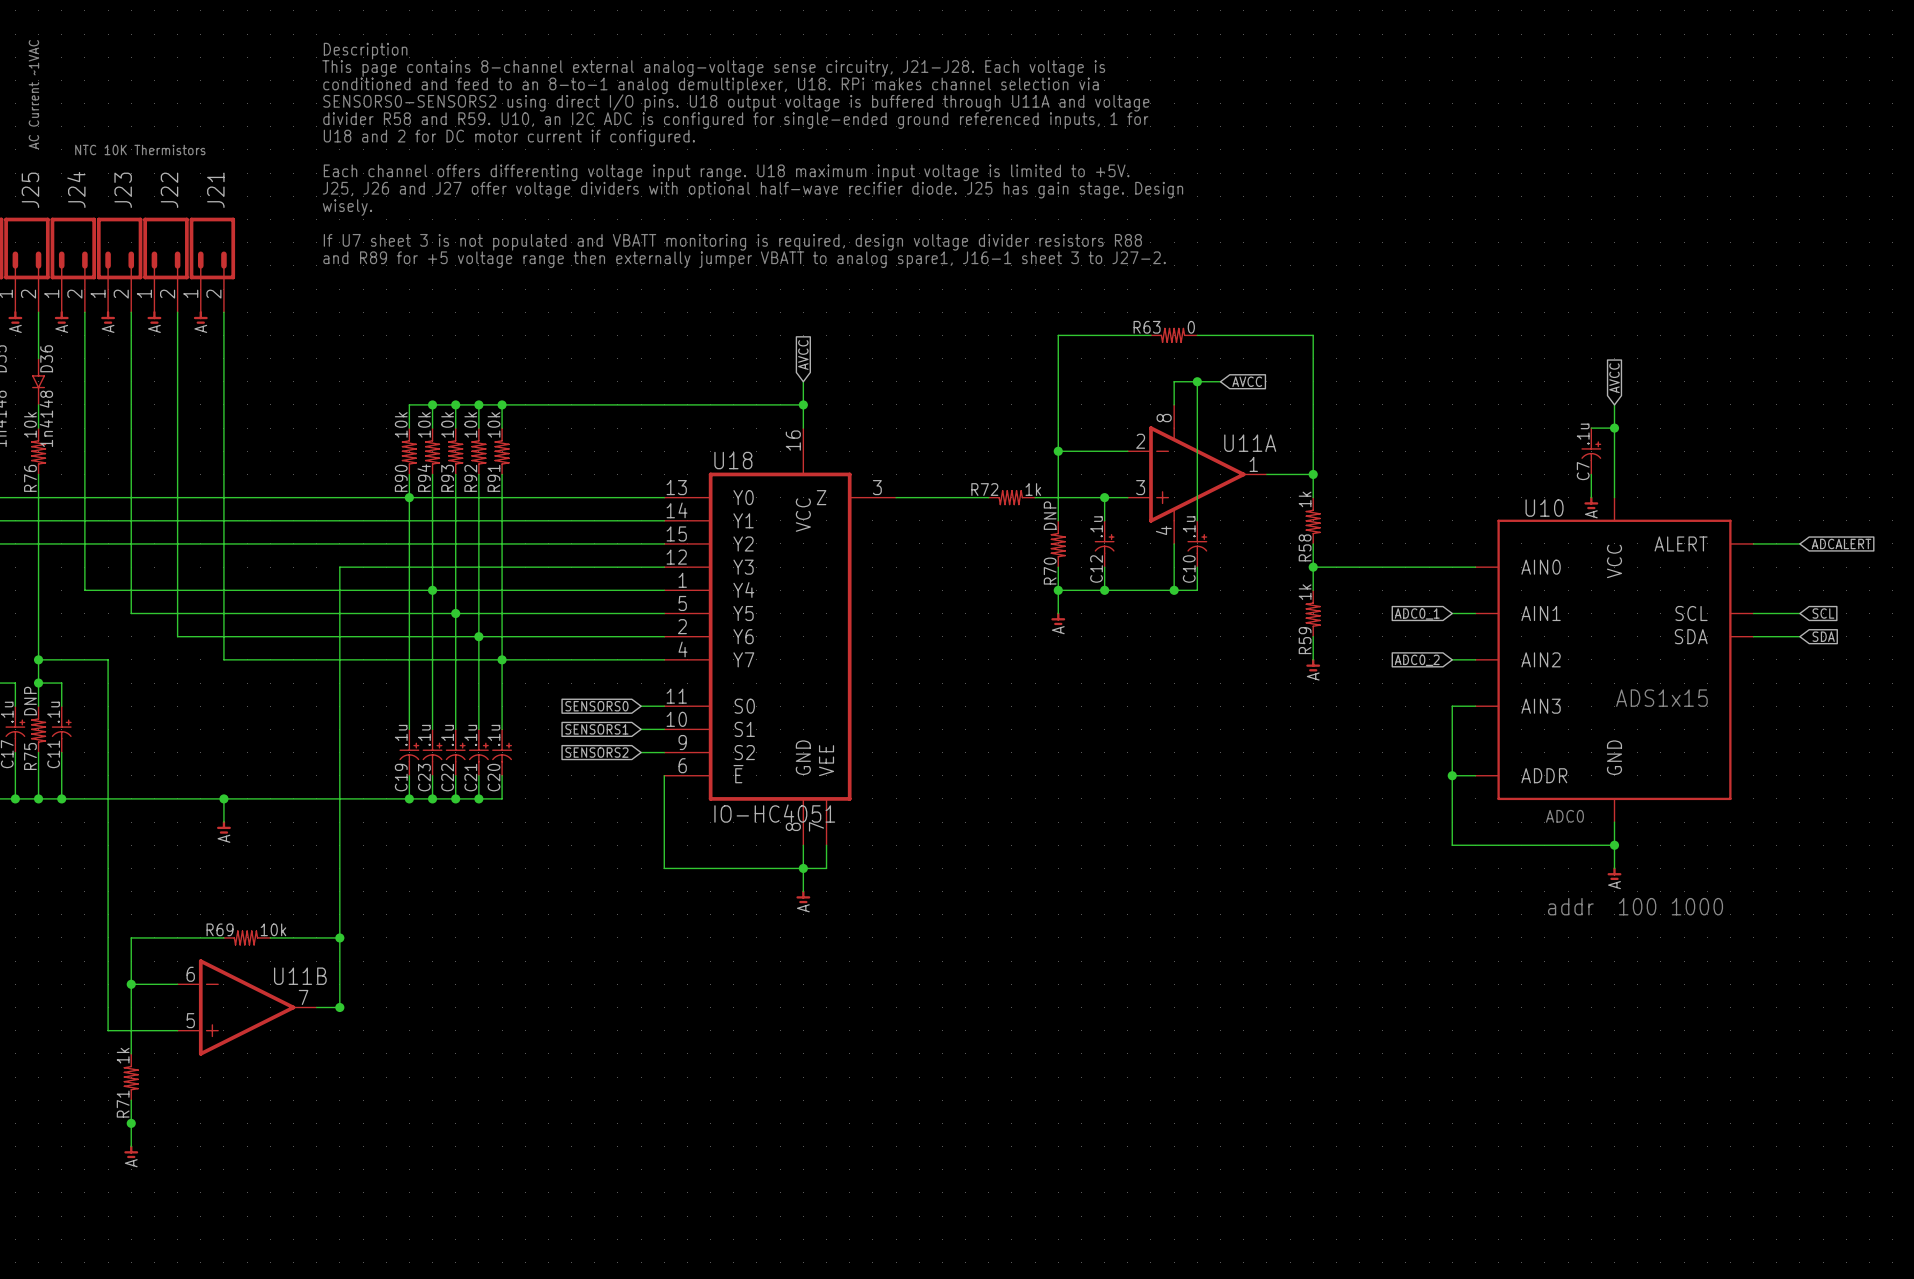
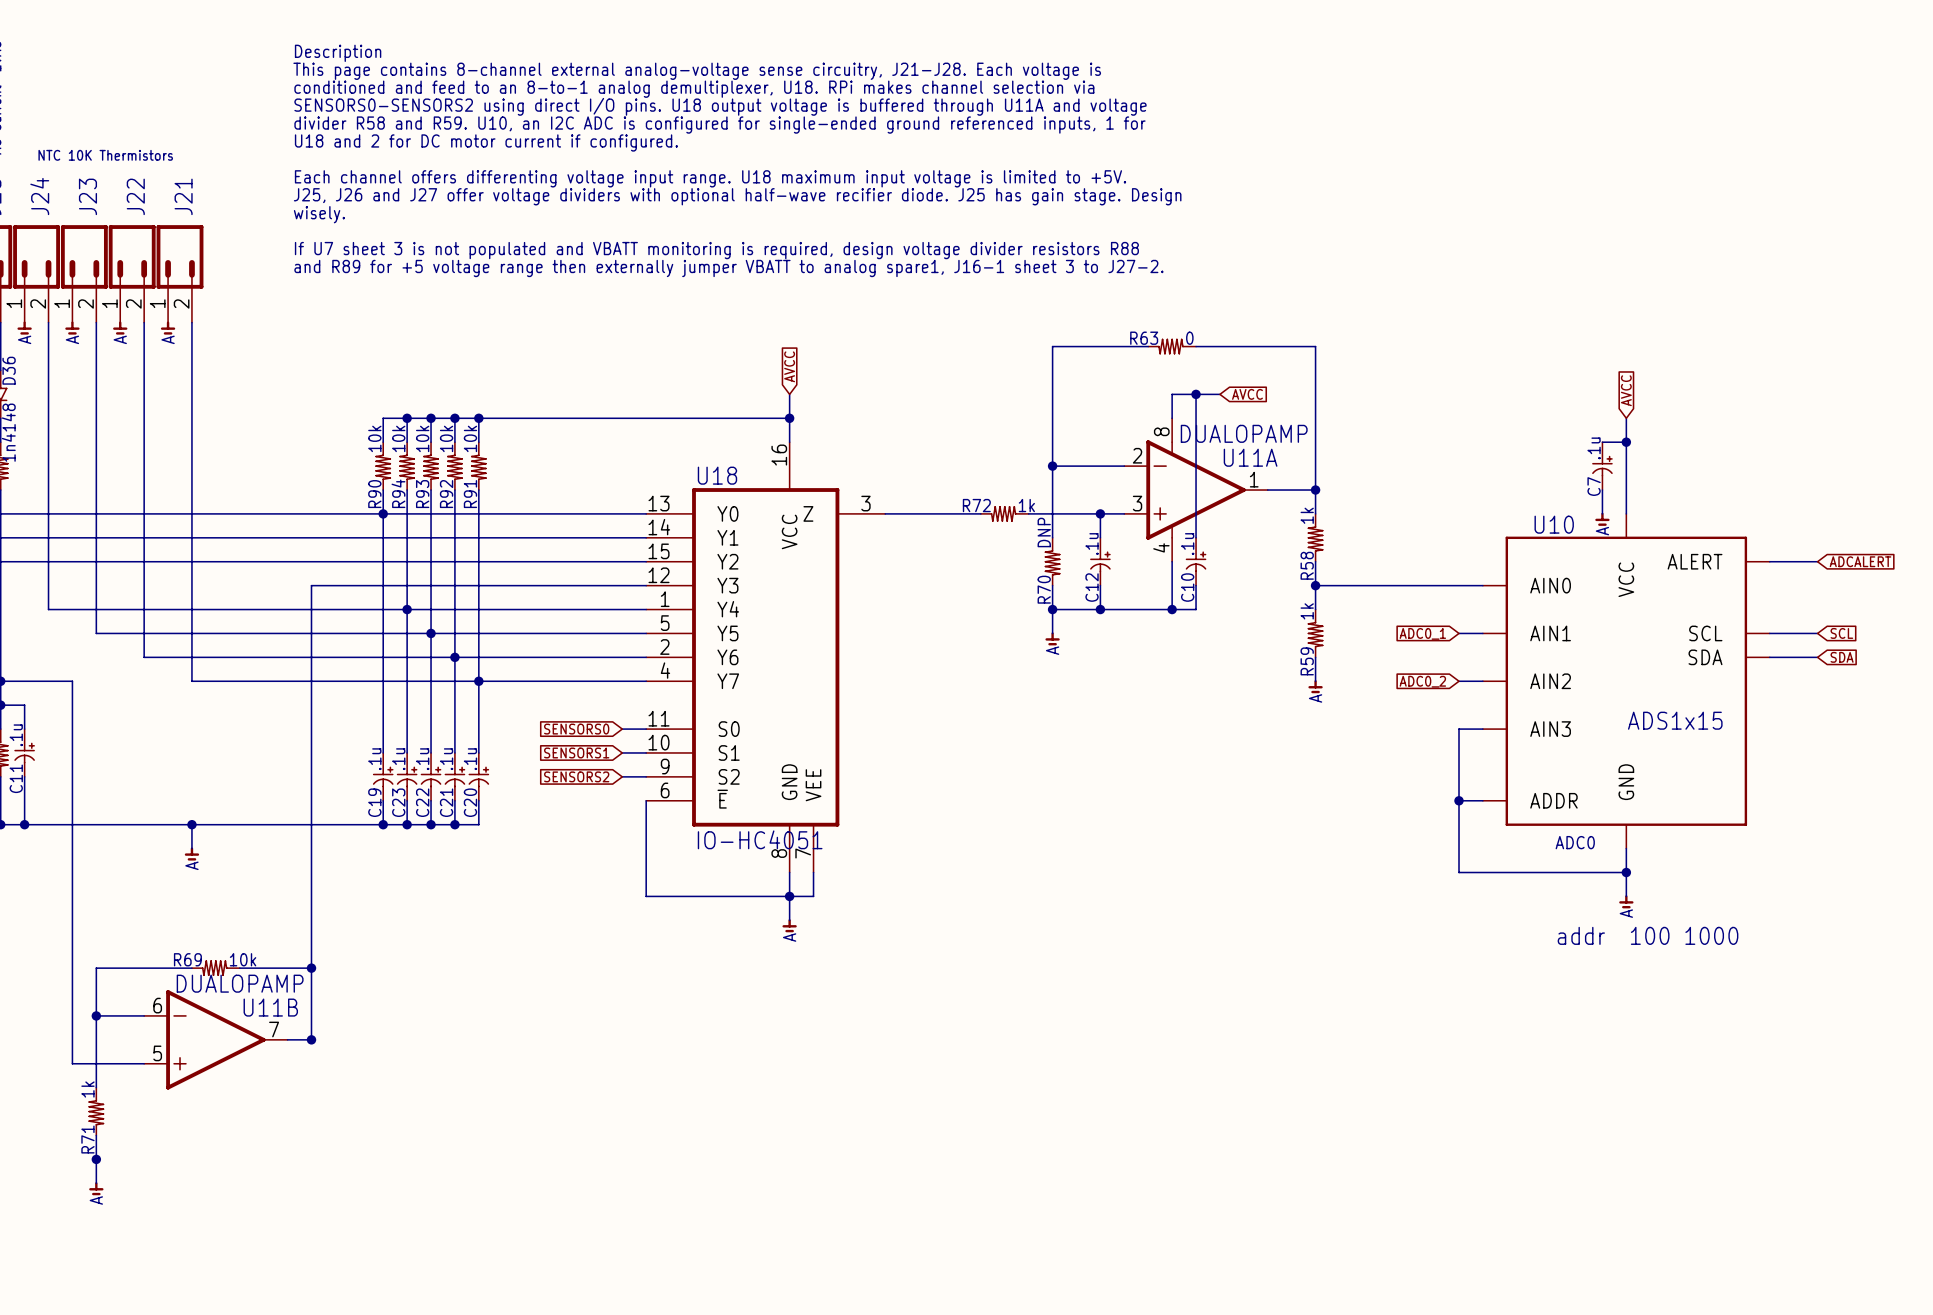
U11A value: none -> DUALOPAMP (1244, 433)
U11B value: none -> DUALOPAMP (240, 983)

